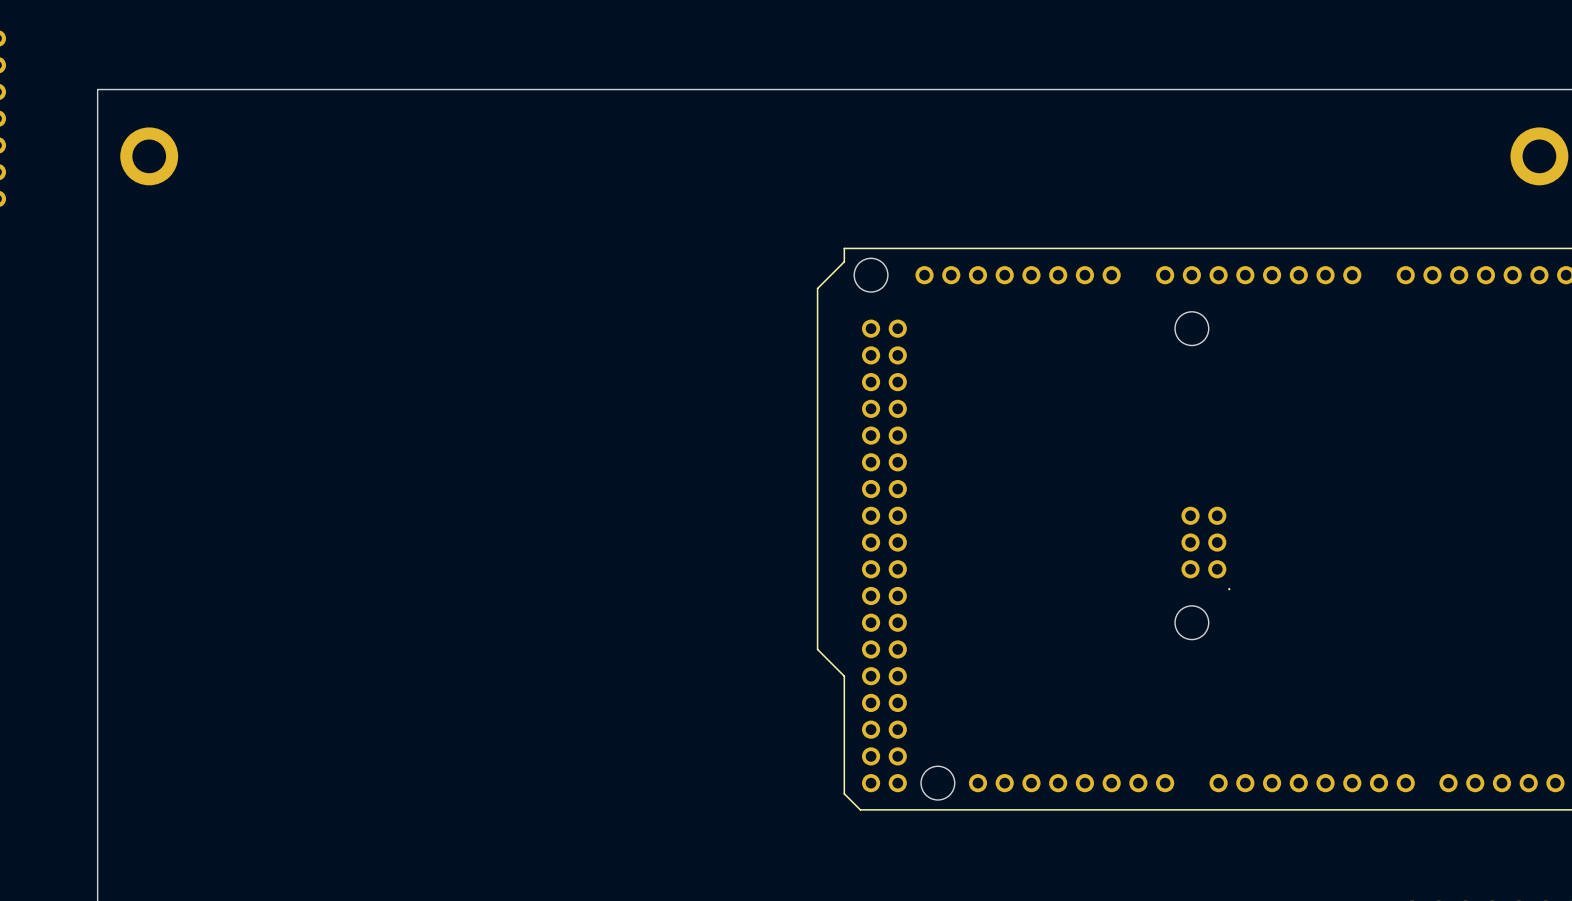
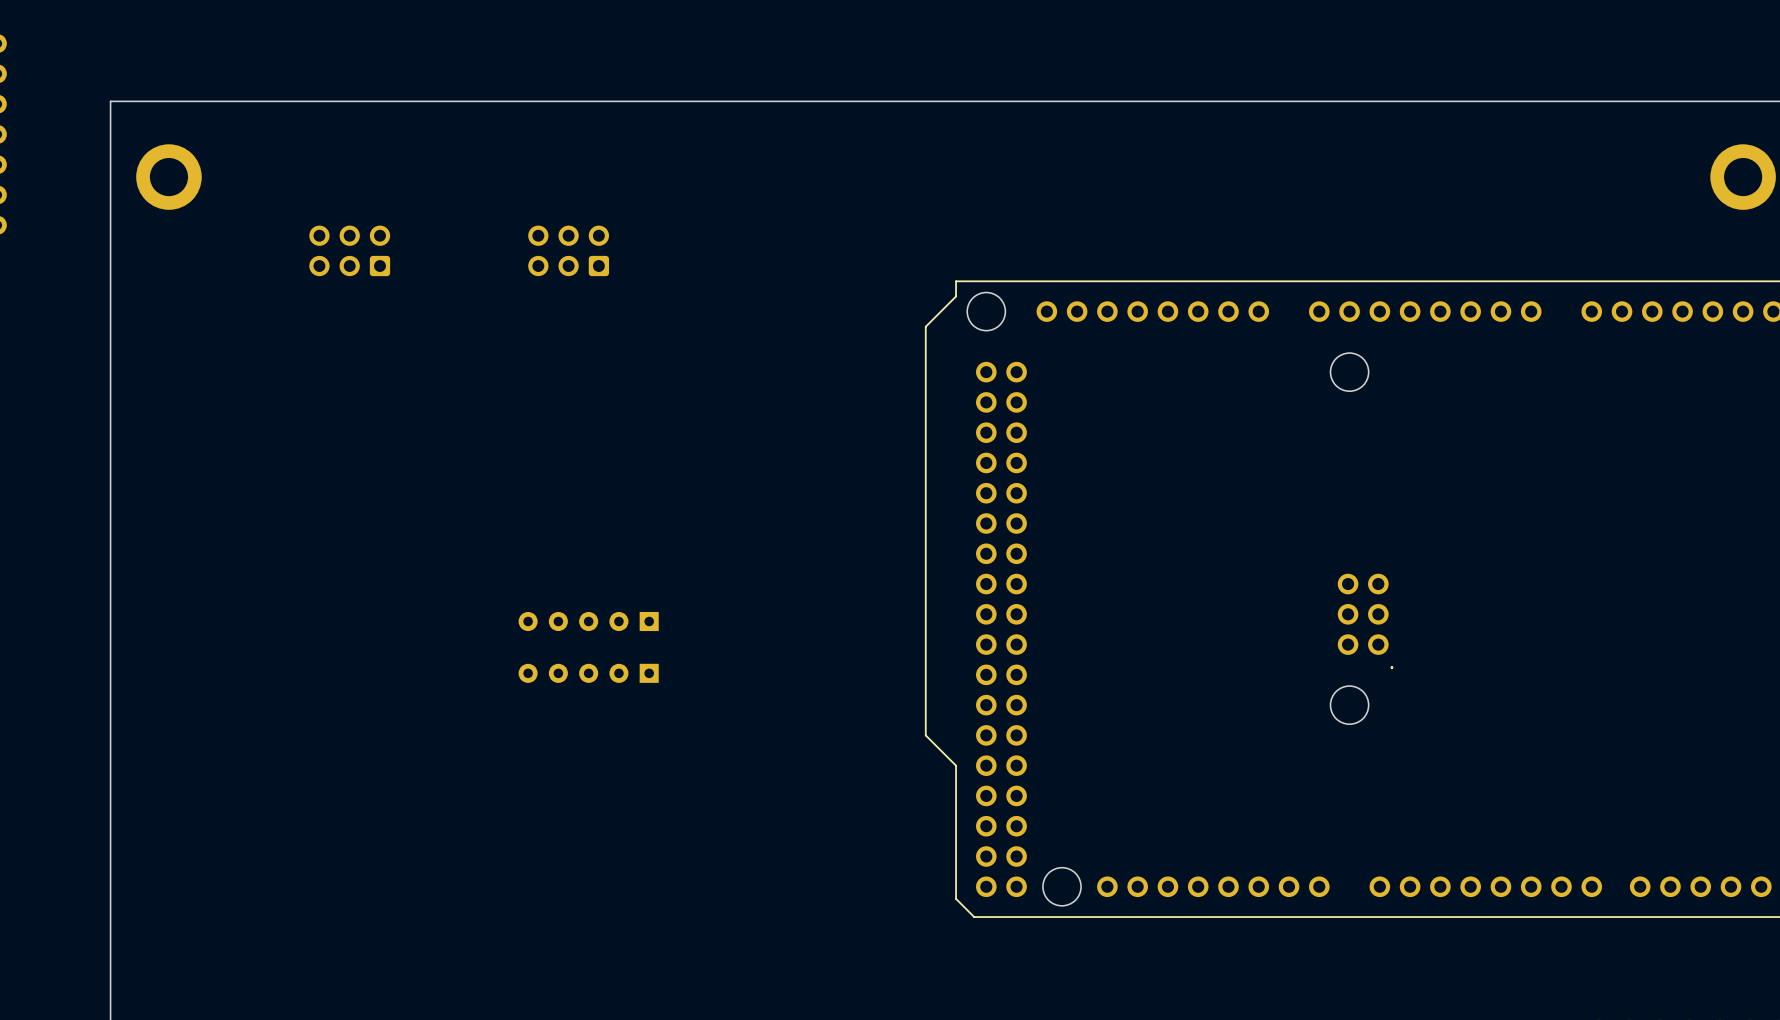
part: none -> (349, 250)
part: none -> (568, 250)
part: none -> (588, 621)
part: none -> (588, 673)

